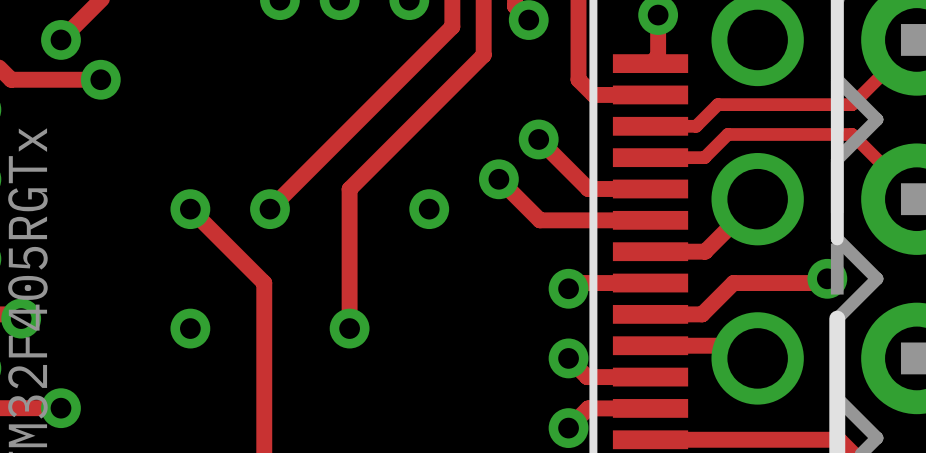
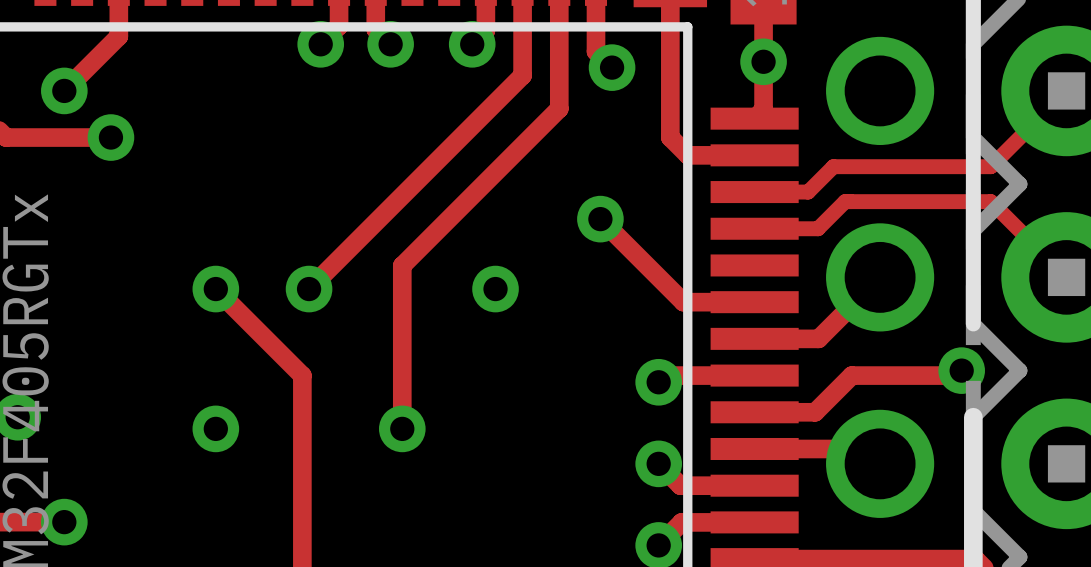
track: (538, 139) (588, 188) (650, 188) -> none
via: (538, 139) -> none
via: none -> (600, 219)
track: (498, 179) (539, 220) (589, 220) -> (600, 219) (683, 302)
via: (498, 179) -> none

